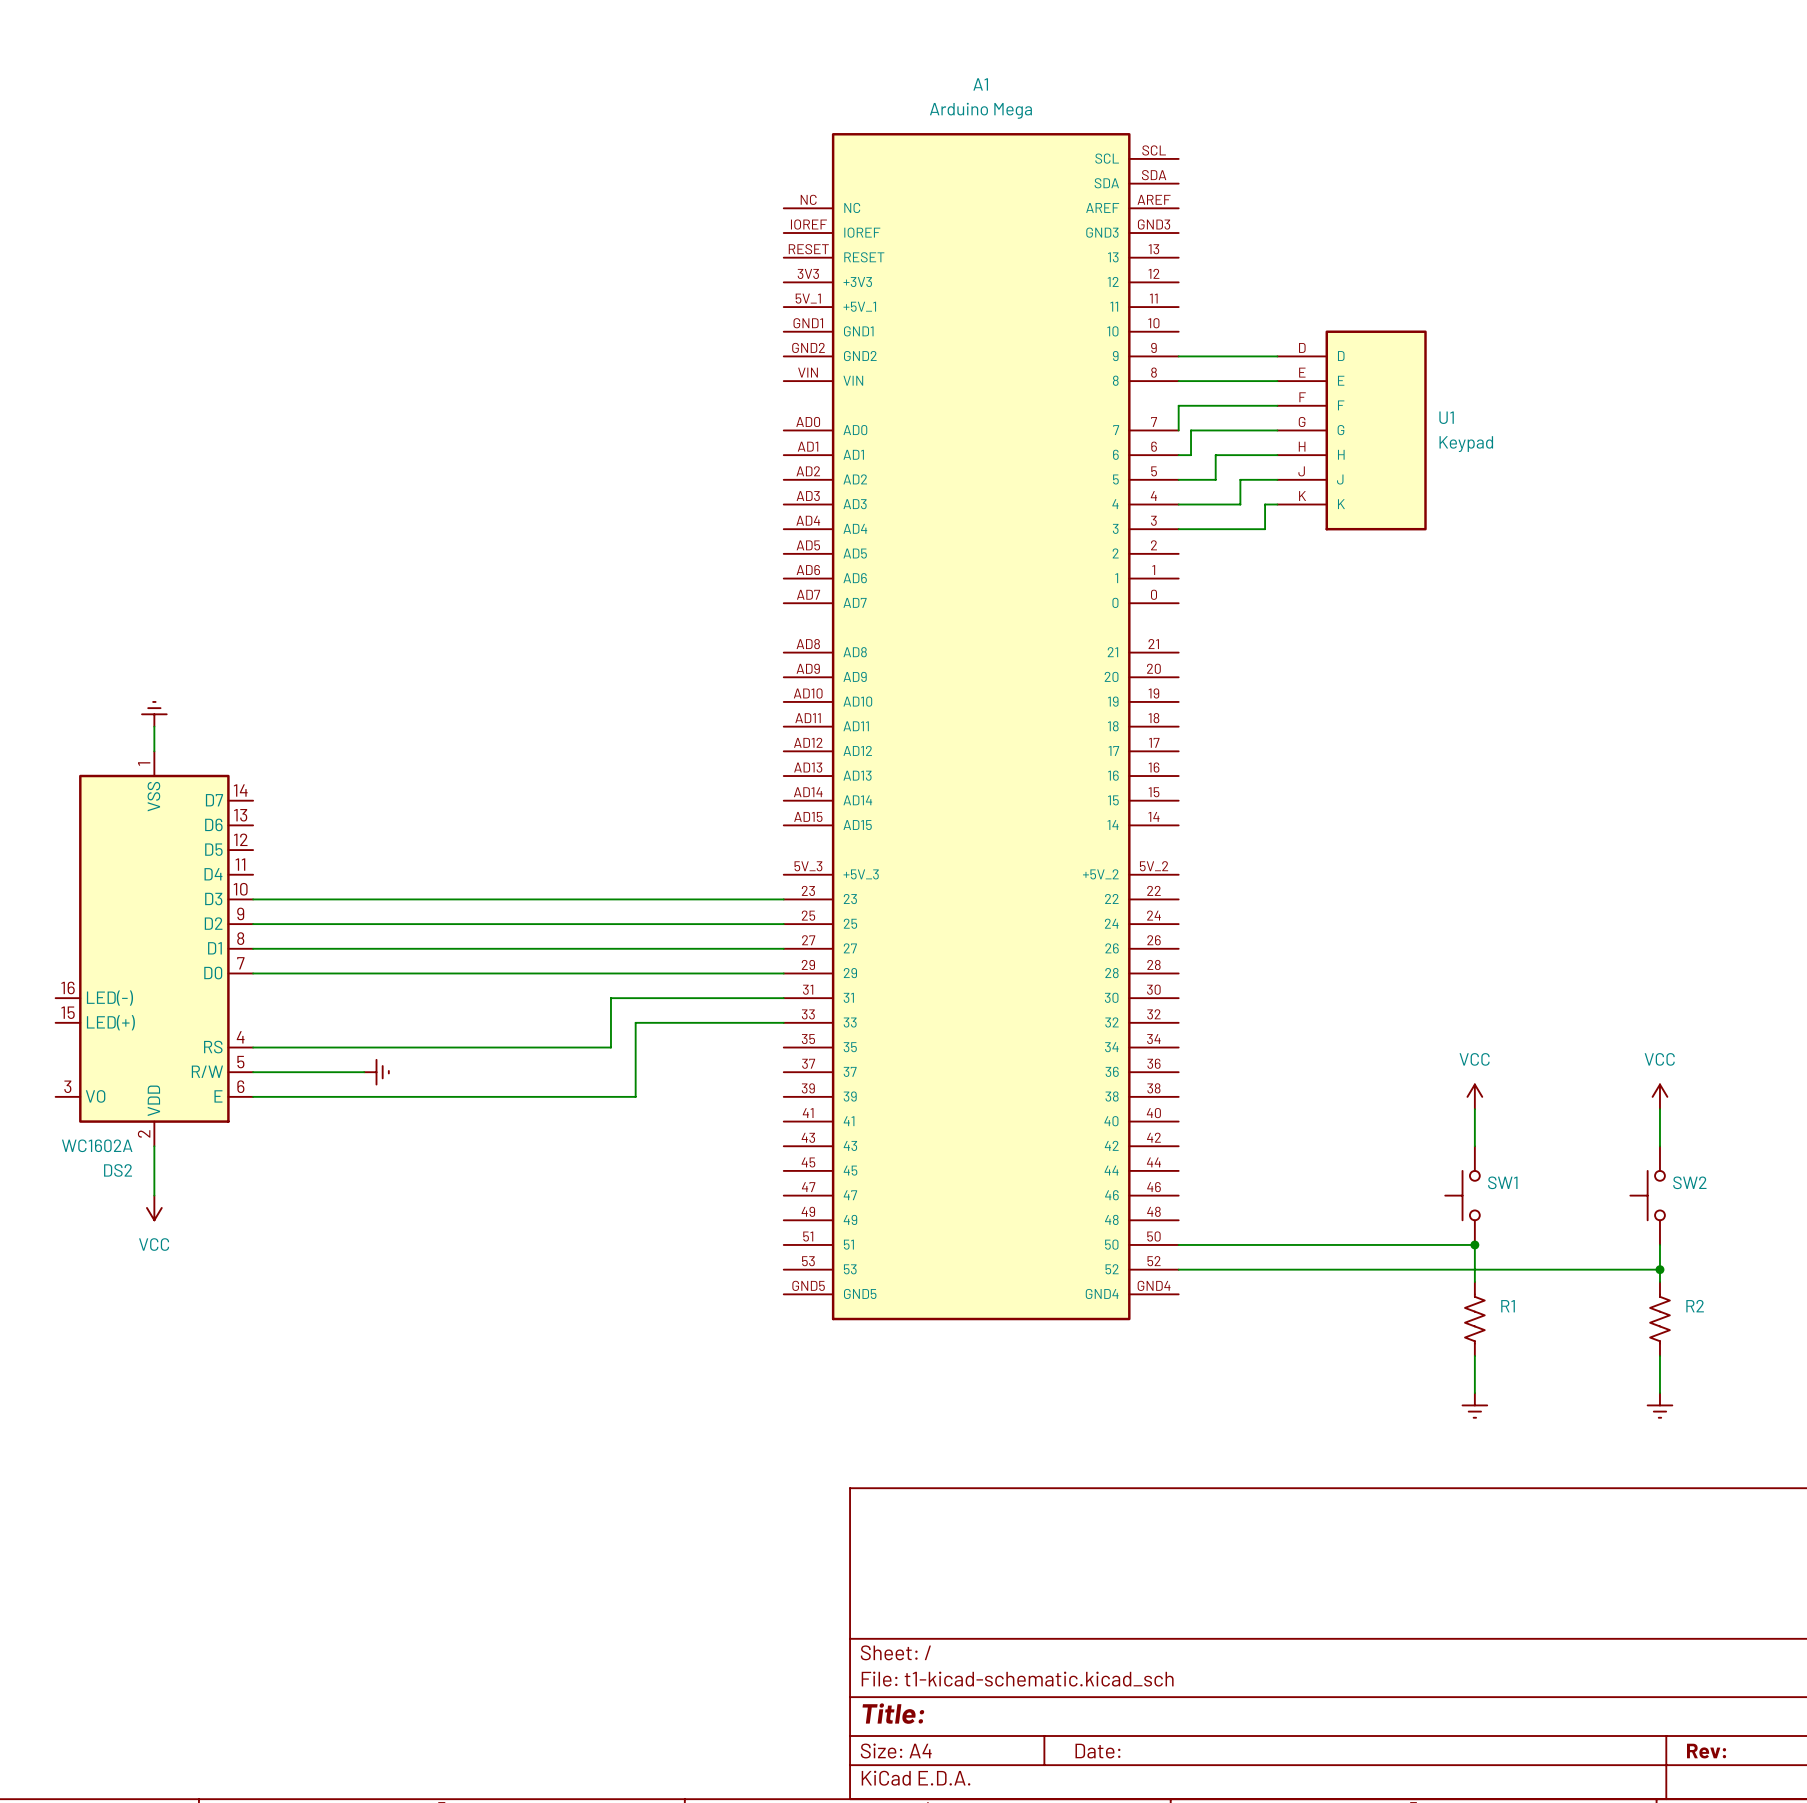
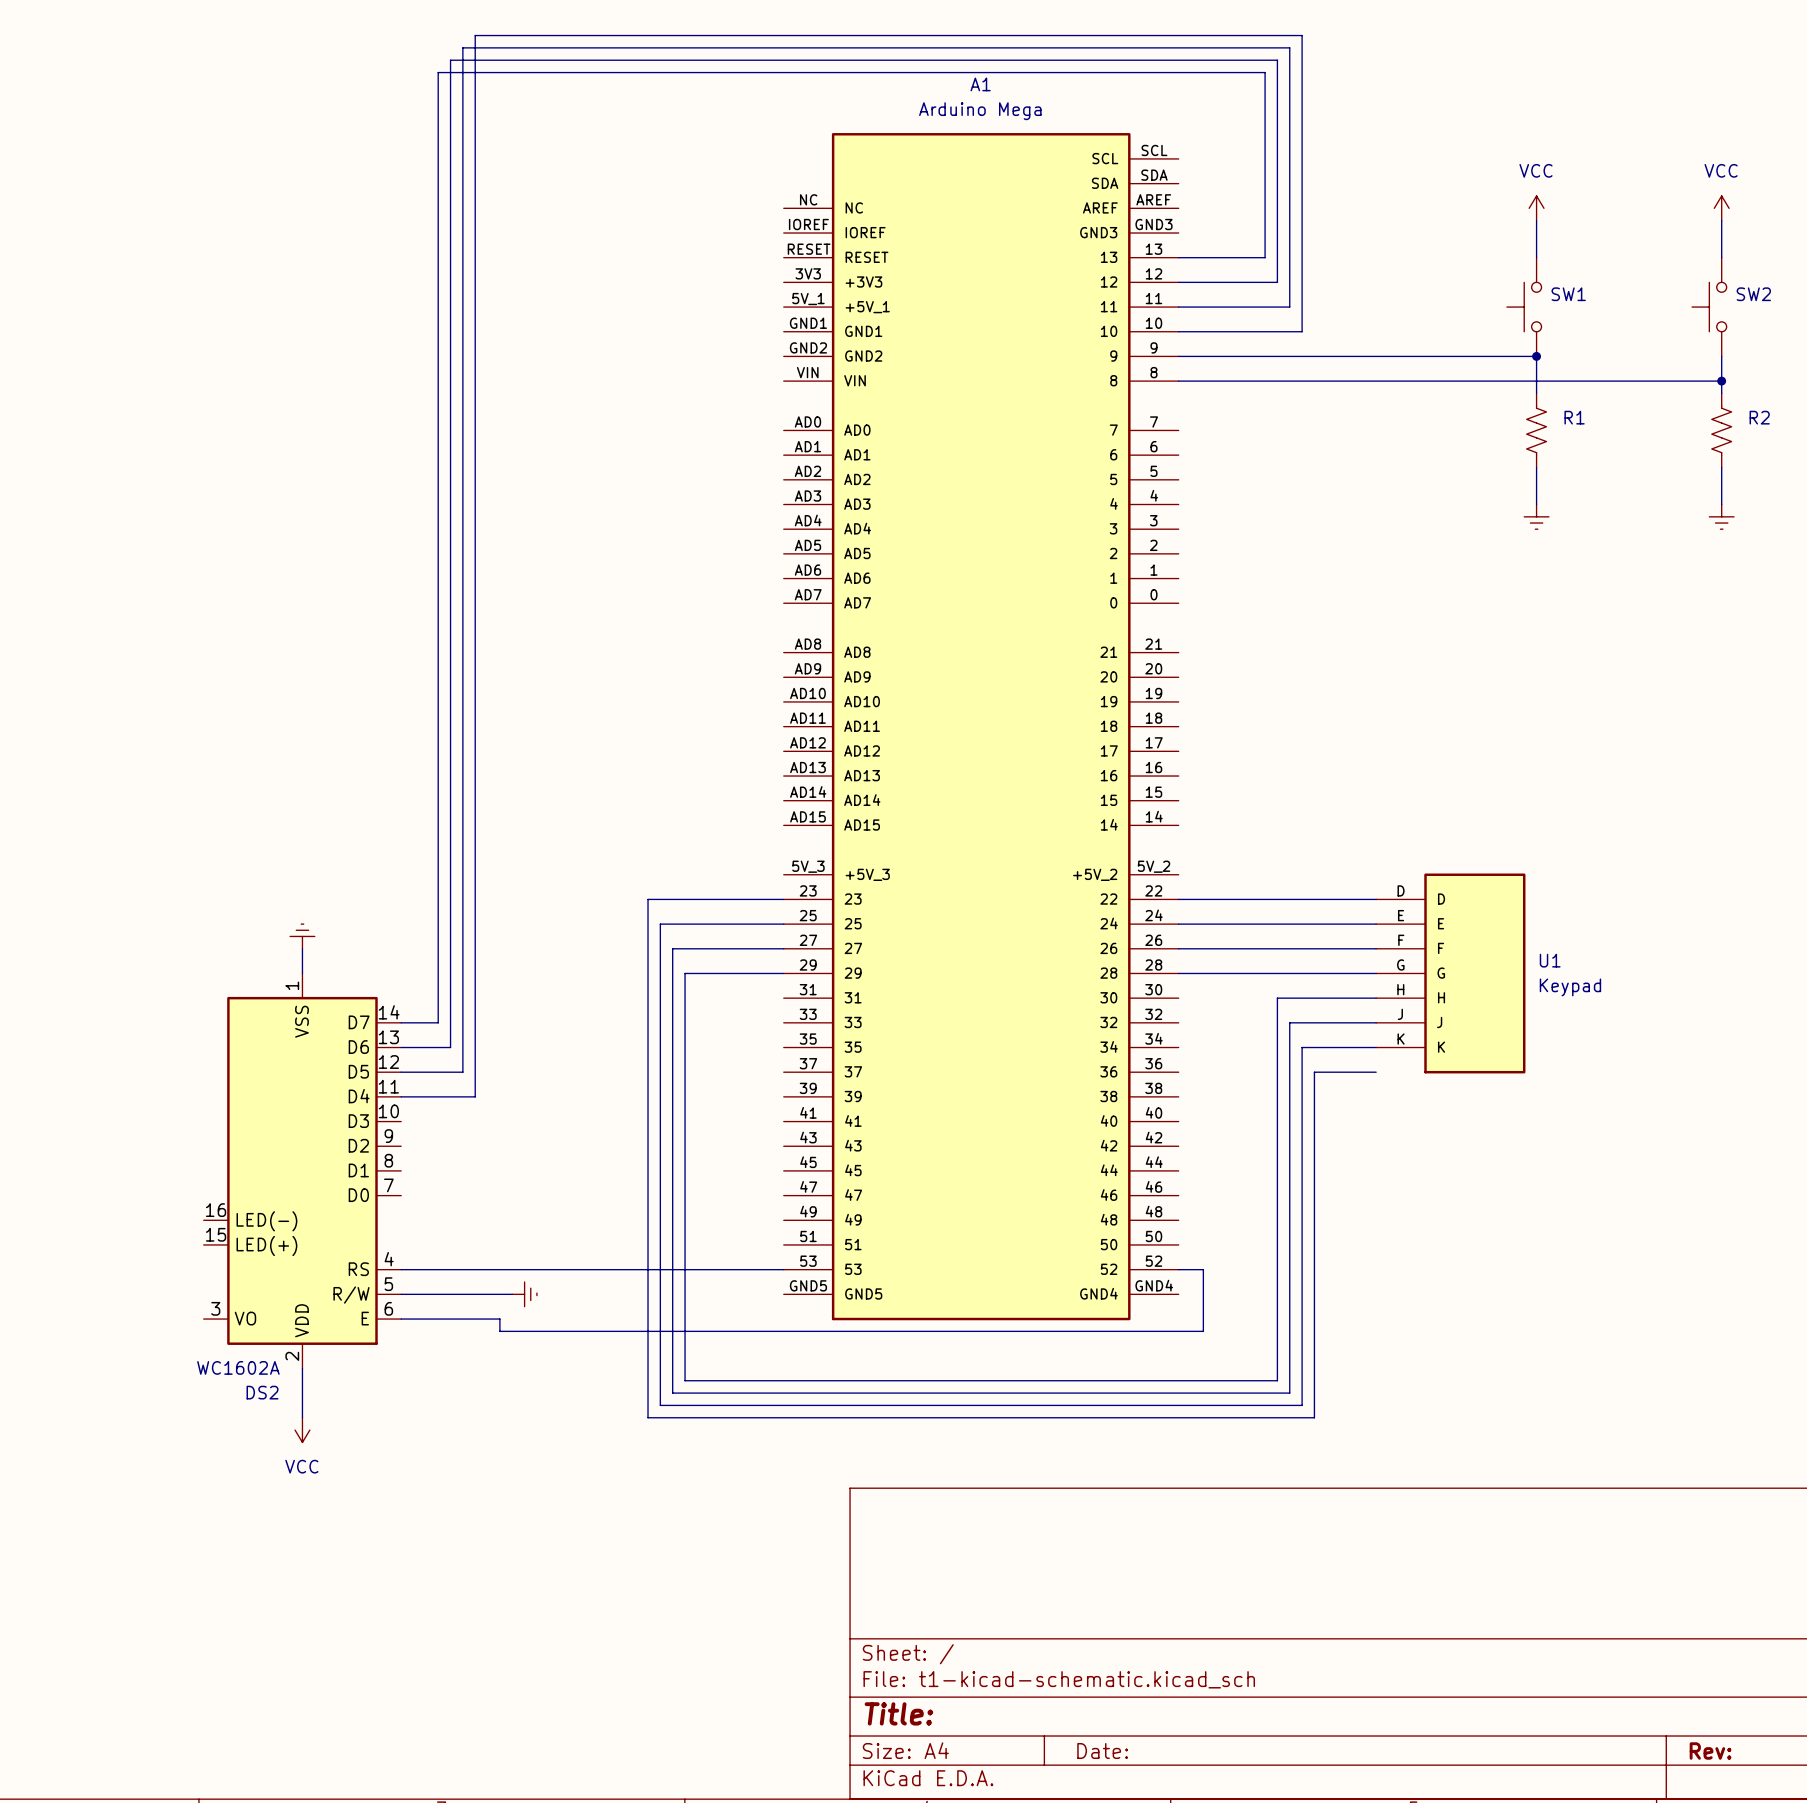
power symbol: none -> VCC (1536, 208)
power symbol: none -> VCC (1721, 208)
wire: none -> (1536, 220) (1536, 257)
wire: none -> (1721, 220) (1721, 257)
wire: none -> (1178, 257) (1265, 257) (1265, 72) (438, 72) (438, 1022) (401, 1022)
wire: none -> (1178, 307) (1289, 307) (1289, 47) (462, 47) (462, 1072) (401, 1072)
wire: none -> (1277, 356) (1536, 356) (1536, 393)
junction: none -> (1536, 356)
wire: none -> (1721, 356) (1721, 393)
wire: none -> (1277, 381) (1721, 381)
junction: none -> (1721, 381)
wire: (1277, 405) (1178, 405) (1178, 430) -> none
wire: (1277, 430) (1191, 430) (1191, 455) (1178, 455) -> none
U1 position: (1352, 430) -> (1450, 973)
wire: (1277, 455) (1215, 455) (1215, 479) (1178, 479) -> none
wire: none -> (1536, 467) (1536, 504)
wire: none -> (1721, 467) (1721, 504)
wire: (1277, 479) (1240, 479) (1240, 504) (1178, 504) -> none
wire: (1277, 504) (1265, 504) (1265, 529) (1178, 529) -> none
power symbol: none -> (1536, 516)
power symbol: none -> (1721, 516)
power symbol: (154, 714) -> none
wire: (154, 726) (154, 751) -> none
wire: (253, 899) (648, 899) -> (1376, 1072) (1314, 1072) (1314, 1417) (648, 1417) (648, 899)
wire: none -> (1178, 899) (1376, 899)
wire: (253, 924) (660, 924) -> (1376, 1047) (1302, 1047) (1302, 1405) (660, 1405) (660, 924)
wire: none -> (1178, 924) (1376, 924)
power symbol: none -> (302, 936)
DS2 position: (154, 948) -> (302, 1170)
wire: (253, 948) (672, 948) -> (1376, 1022) (1289, 1022) (1289, 1393) (672, 1393) (672, 948)
wire: none -> (302, 948) (302, 973)
wire: none -> (1178, 948) (1376, 948)
wire: (253, 973) (685, 973) -> (1376, 998) (1277, 998) (1277, 1380) (685, 1380) (685, 973)
wire: none -> (1178, 973) (1376, 973)
wire: (783, 998) (610, 998) (610, 1047) (450, 1047) -> (1178, 282) (1277, 282) (1277, 60) (450, 60) (450, 1047)
wire: (783, 1022) (635, 1022) (635, 1096) (475, 1096) -> (1178, 331) (1302, 331) (1302, 35) (475, 35) (475, 1096)
power symbol: (376, 1072) -> none
power symbol: VCC (1474, 1096) -> none
power symbol: VCC (1659, 1096) -> none
wire: (1474, 1109) (1474, 1146) -> none
wire: (1659, 1109) (1659, 1146) -> none
wire: (154, 1146) (154, 1195) -> none
SW1 position: (1462, 1195) -> (1524, 307)
SW2 position: (1647, 1195) -> (1709, 307)
power symbol: VCC (154, 1207) -> none
wire: (1178, 1244) (1474, 1244) (1474, 1282) -> none
junction: (1474, 1244) -> none
wire: (1659, 1244) (1659, 1282) -> none
wire: none -> (401, 1269) (783, 1269)
wire: (1203, 1269) (1659, 1269) -> (1203, 1269) (1203, 1331) (499, 1331) (499, 1319) (401, 1319)
junction: (1659, 1269) -> none
wire: none -> (401, 1294) (512, 1294)
power symbol: none -> (524, 1294)
R1 position: (1474, 1319) -> (1536, 430)
R2 position: (1659, 1319) -> (1721, 430)
wire: (1474, 1356) (1474, 1393) -> none
wire: (1659, 1356) (1659, 1393) -> none
wire: none -> (302, 1368) (302, 1417)
power symbol: (1474, 1405) -> none
power symbol: (1659, 1405) -> none
power symbol: none -> VCC (302, 1430)

